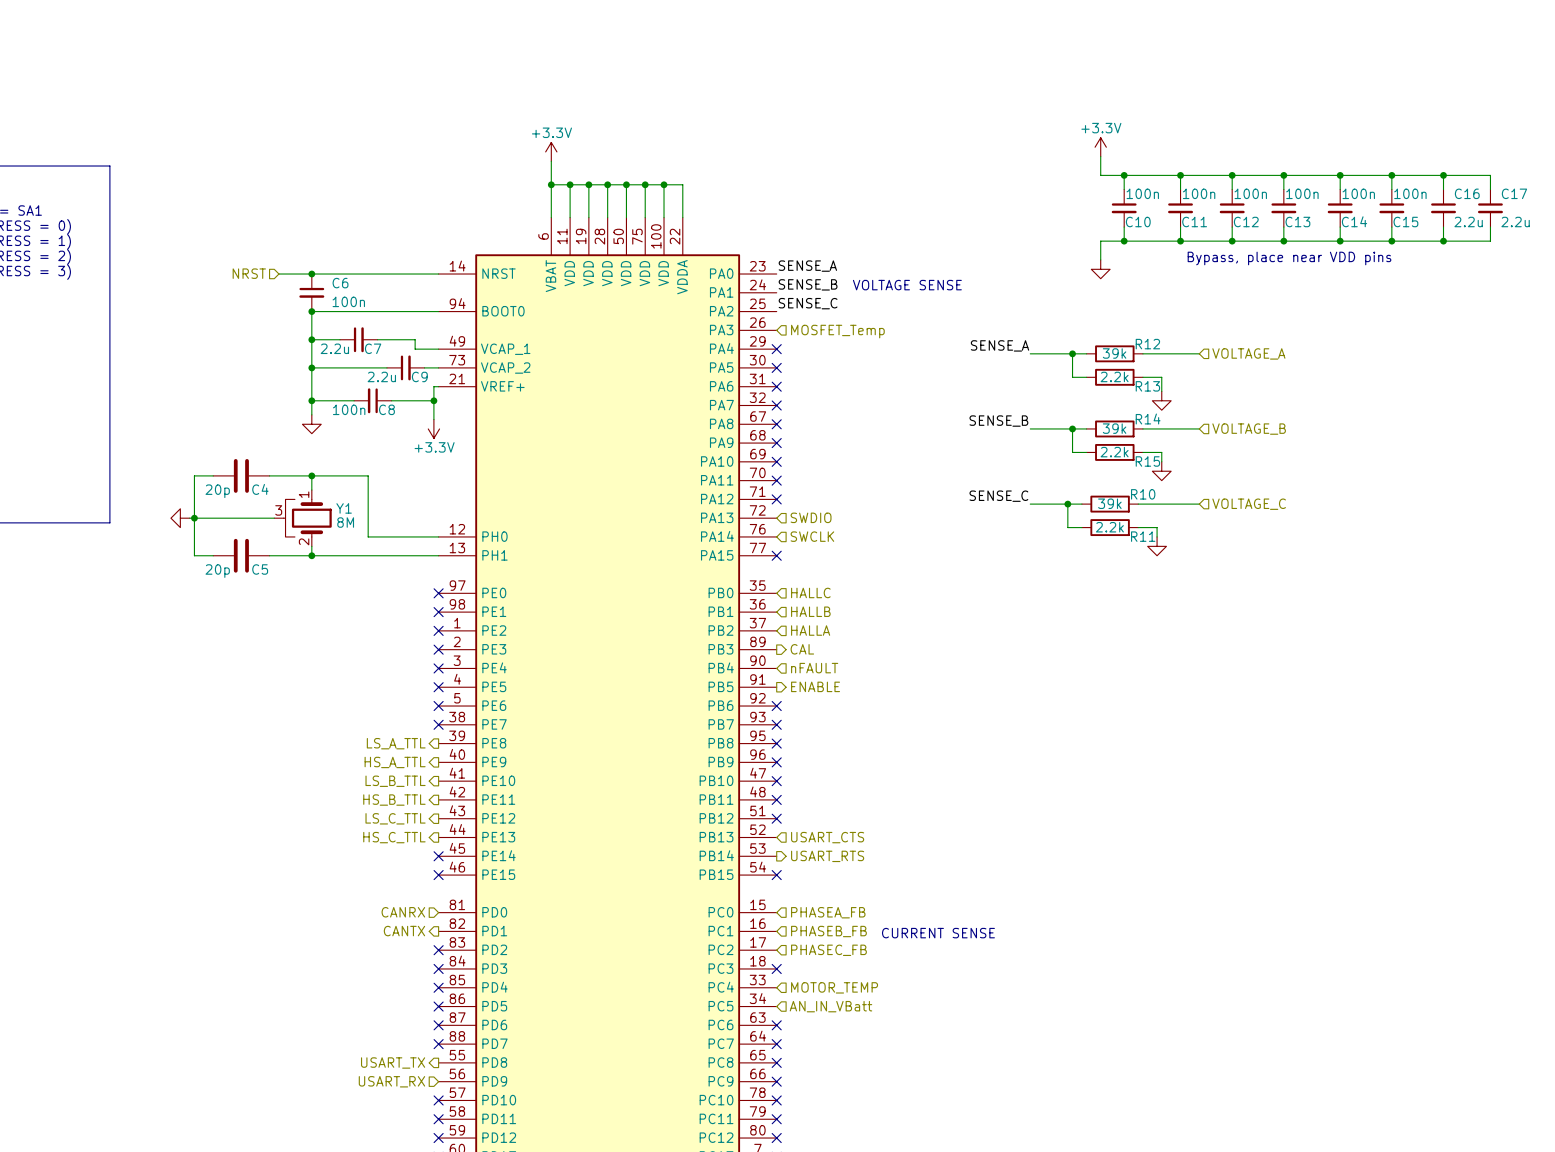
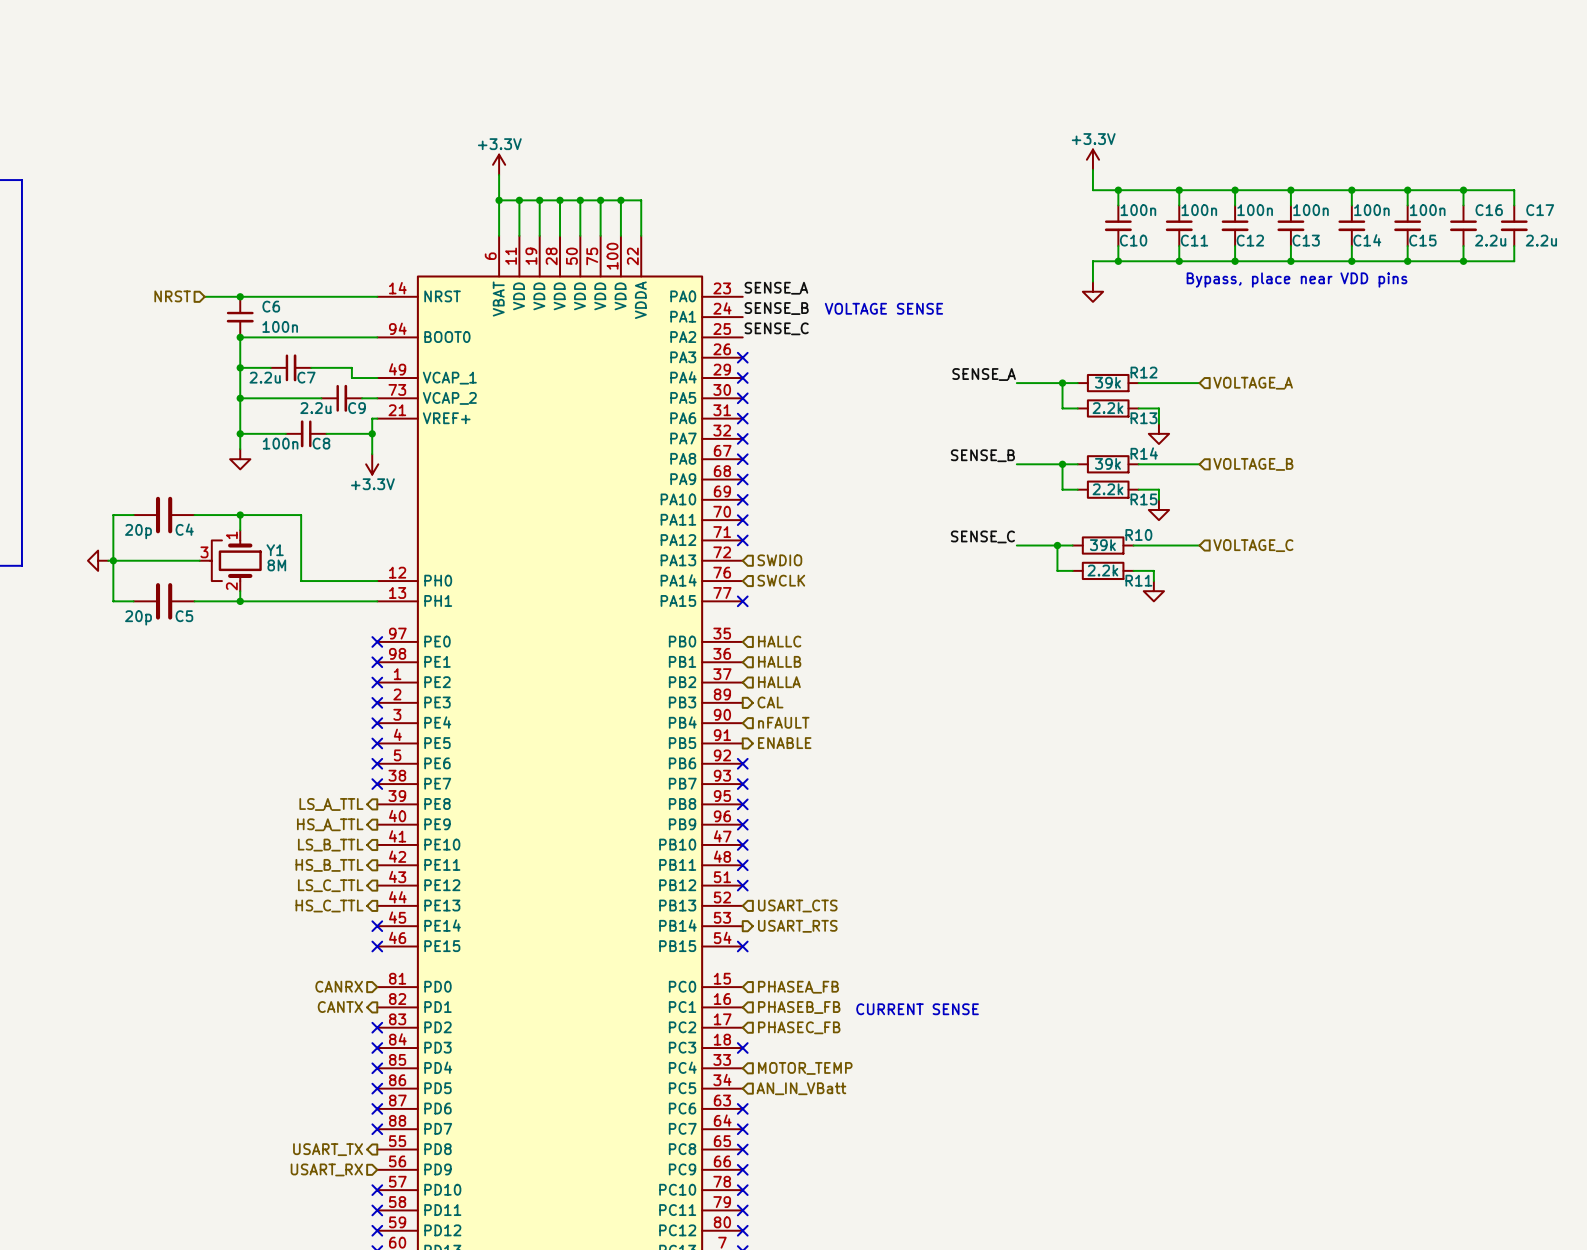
no-connect mark: none -> (742, 357)
hierarchical label: MOSFET_Temp (837, 331) -> none

